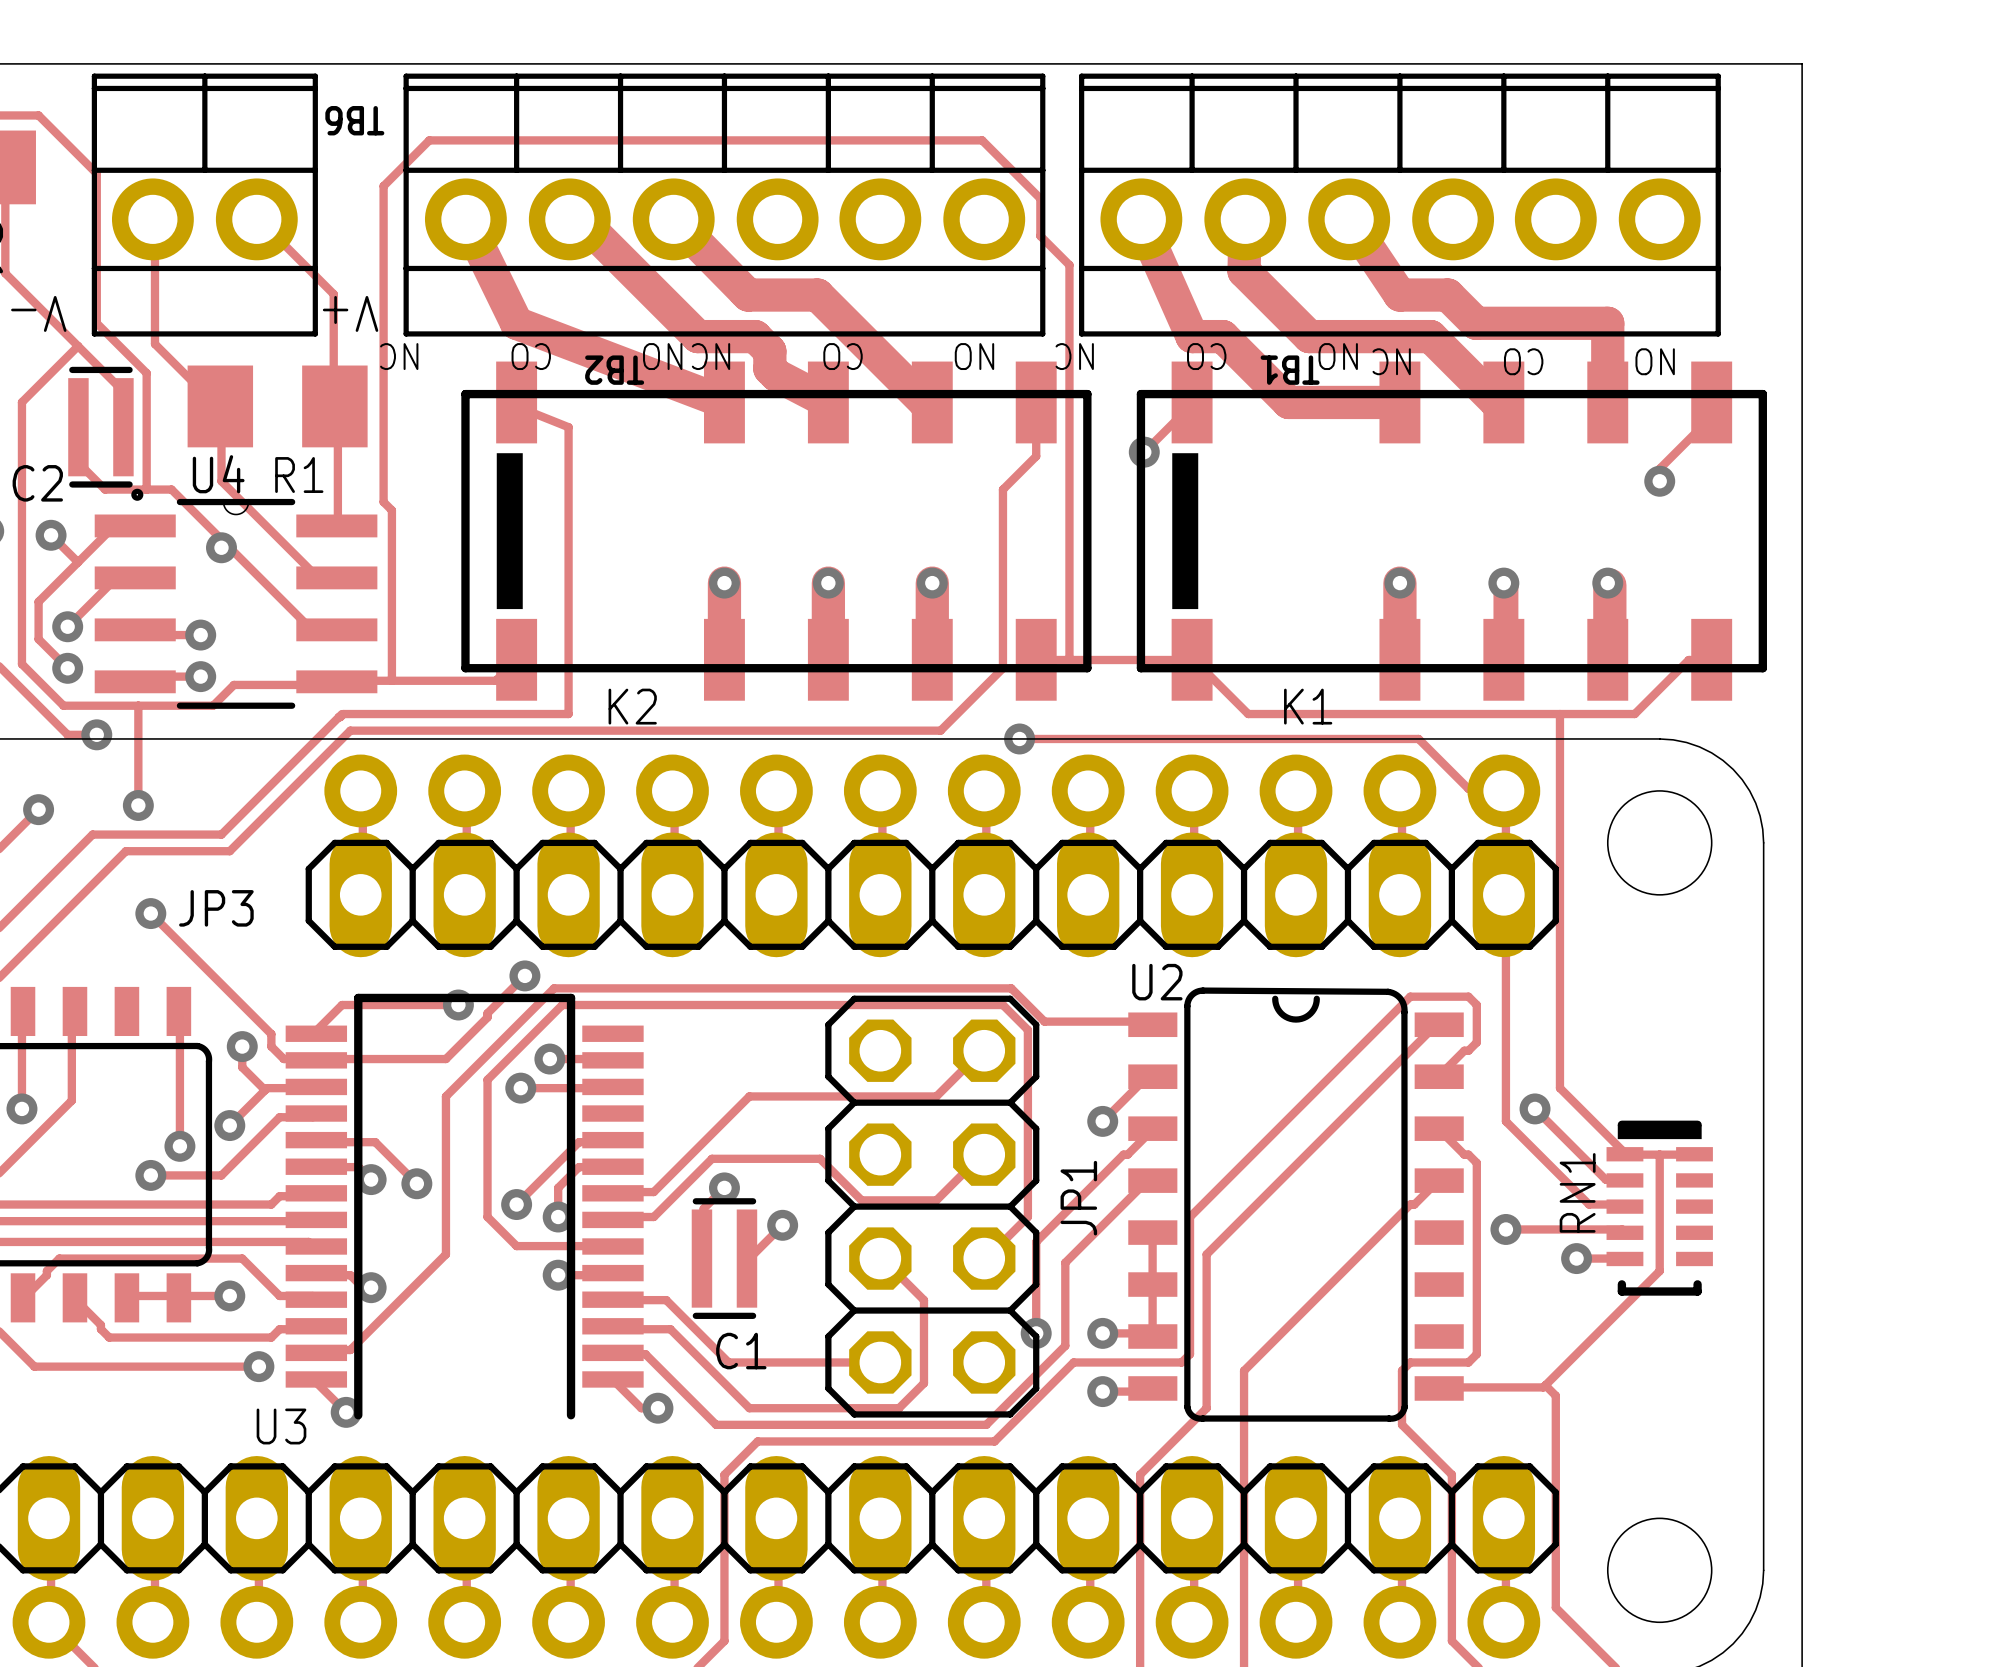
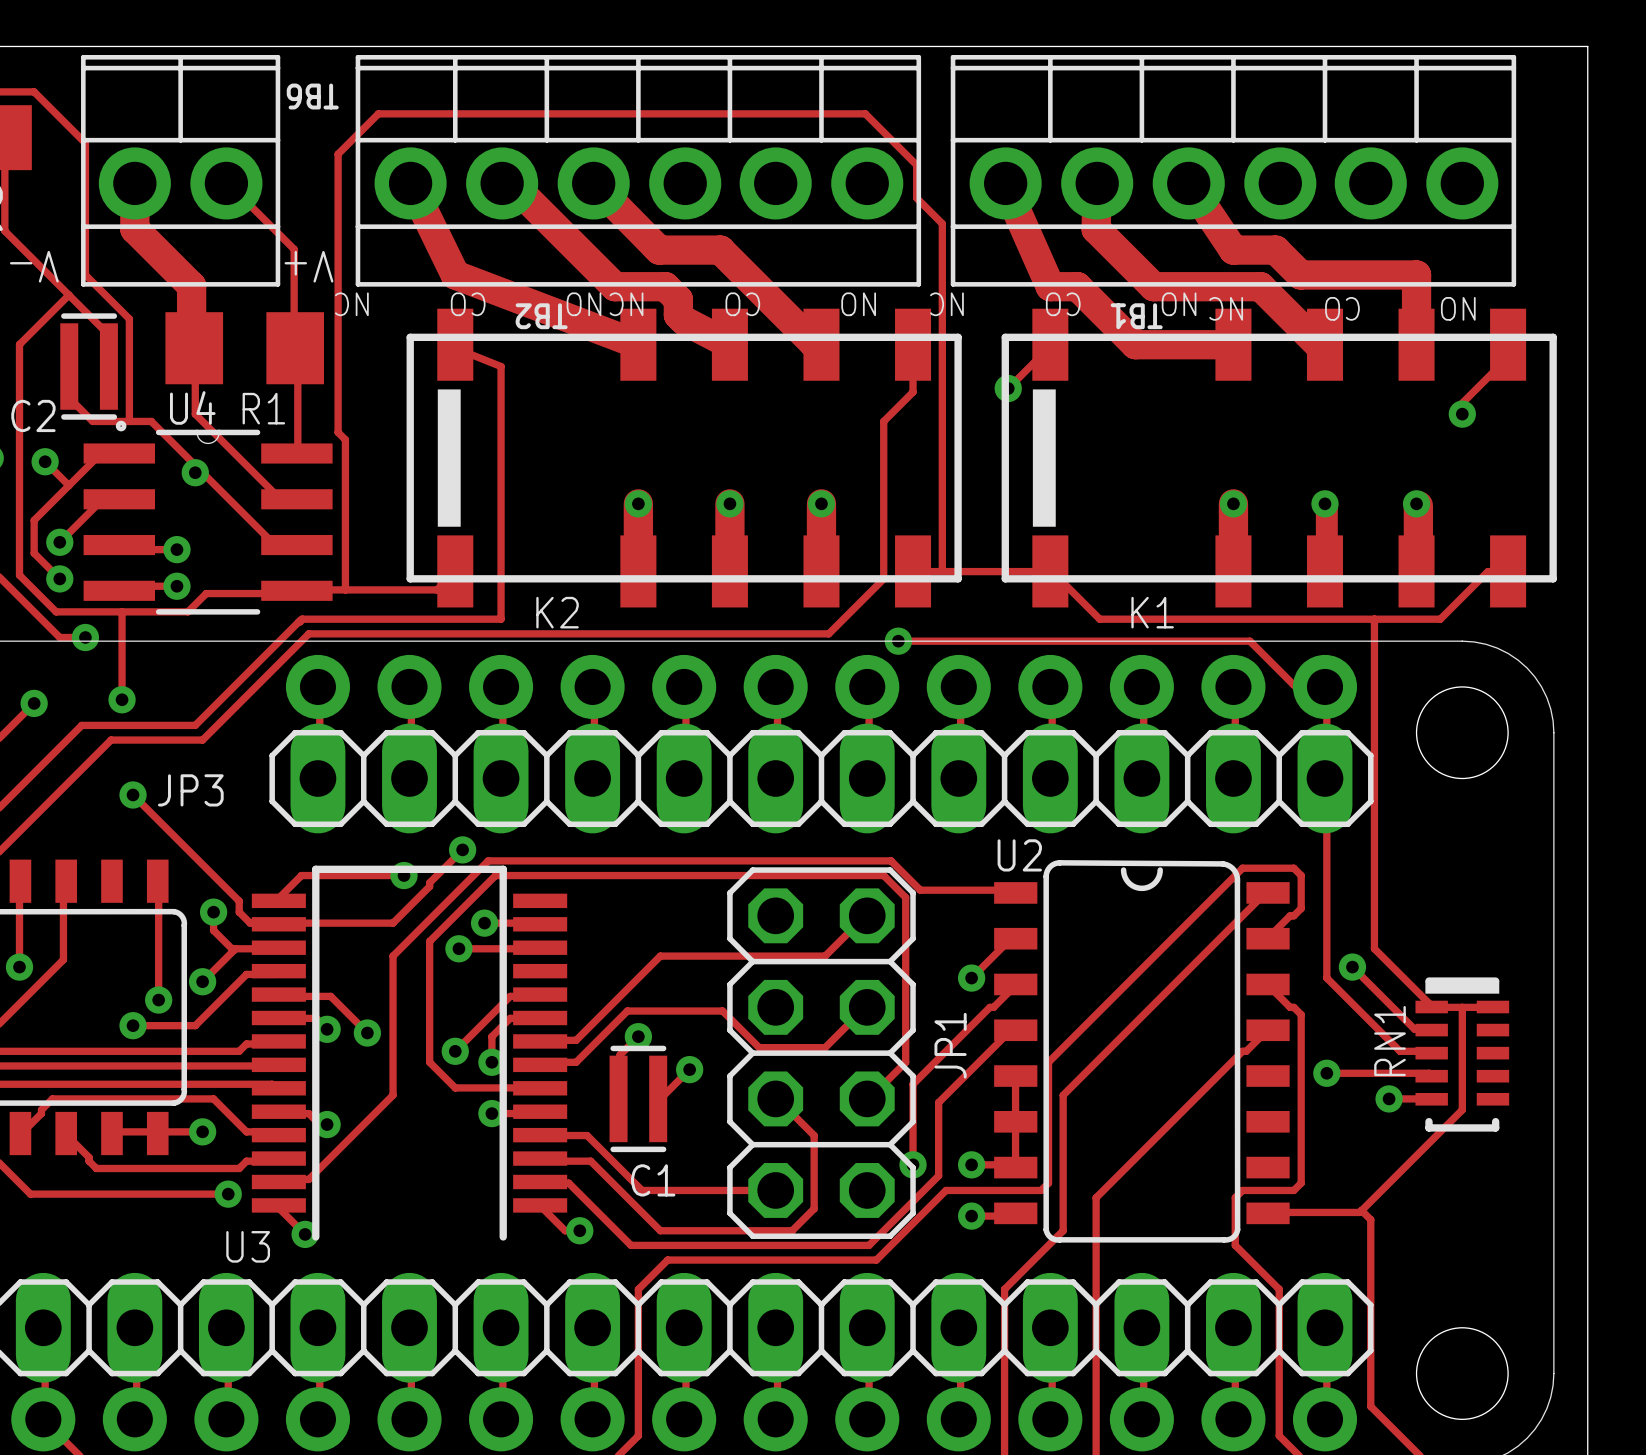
track: (152, 219) (154, 219) (154, 344) (217, 406) -> (134, 183) (134, 229) (191, 285) (191, 348)

